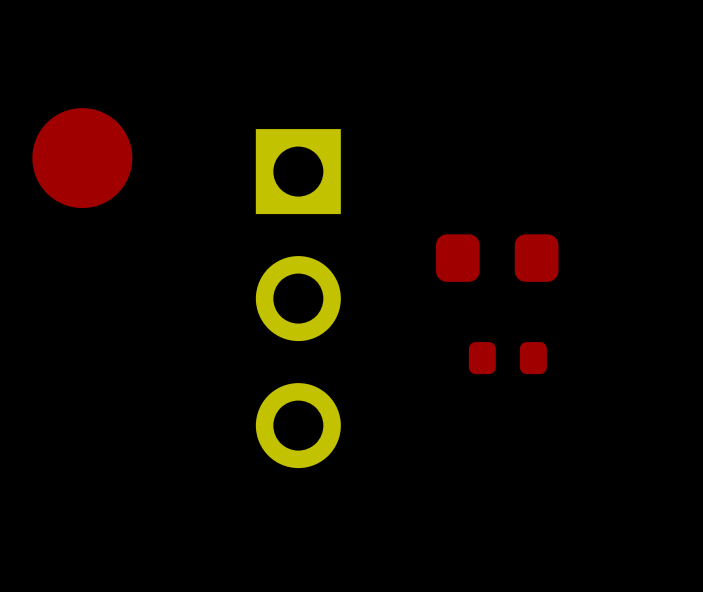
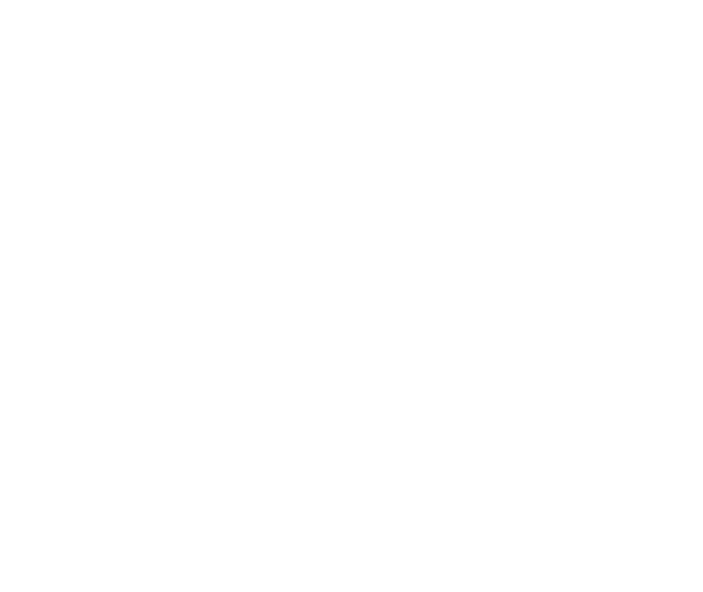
part: (82, 158) -> none
part: (497, 258) -> none
part: (298, 298) -> none
part: (507, 358) -> none

